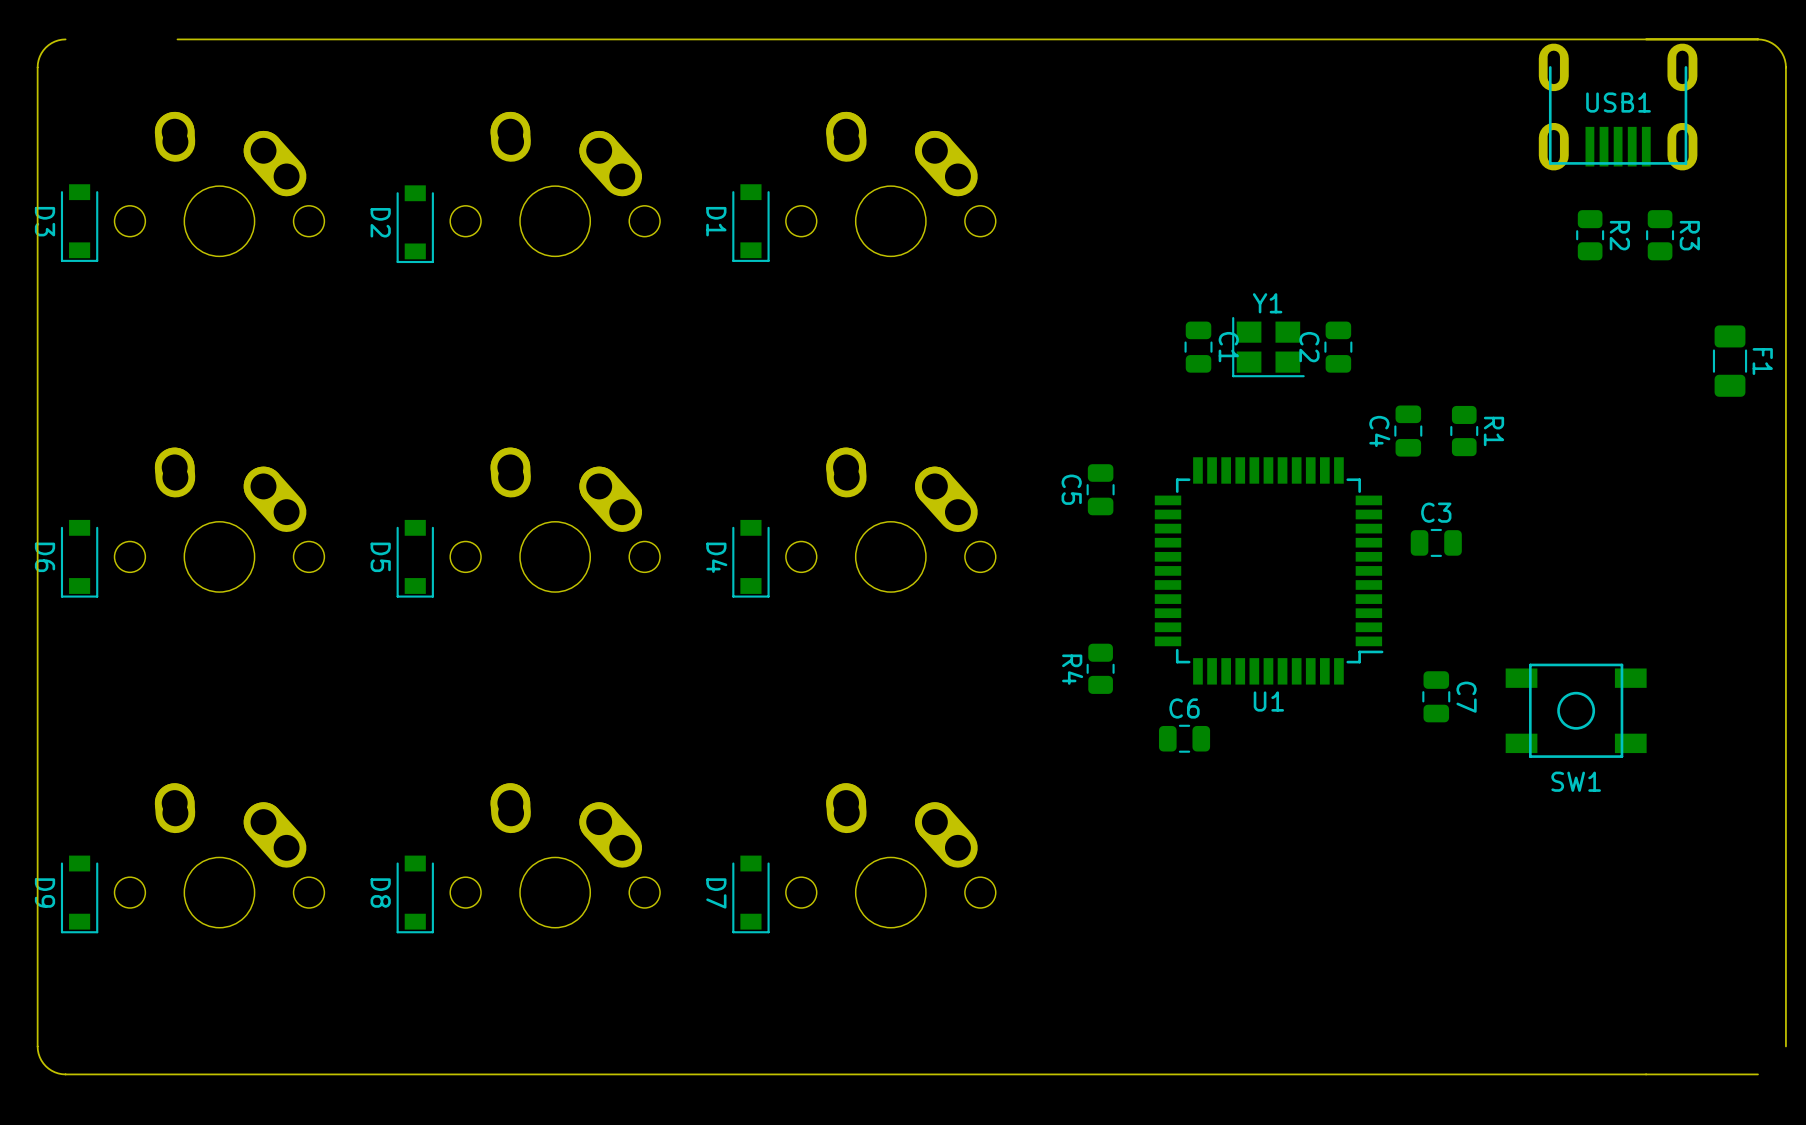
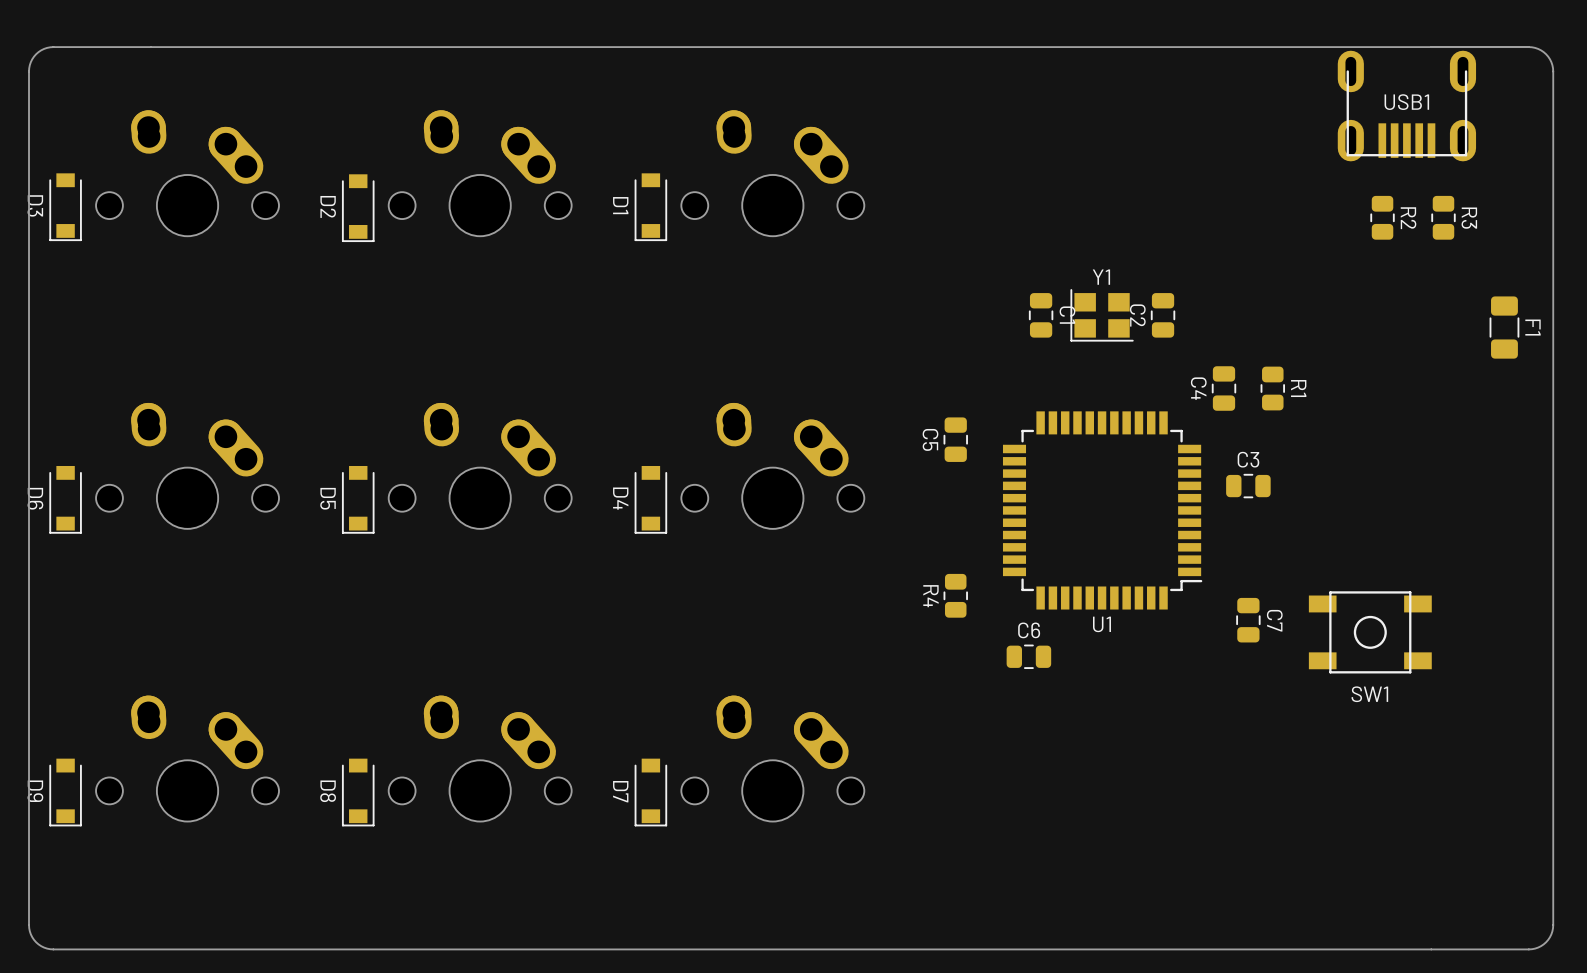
board edge: none -> (150, 47) (53, 47)
board edge: none -> (1553, 925) (1551, 934) (1546, 942) (1538, 947) (1528, 949)

